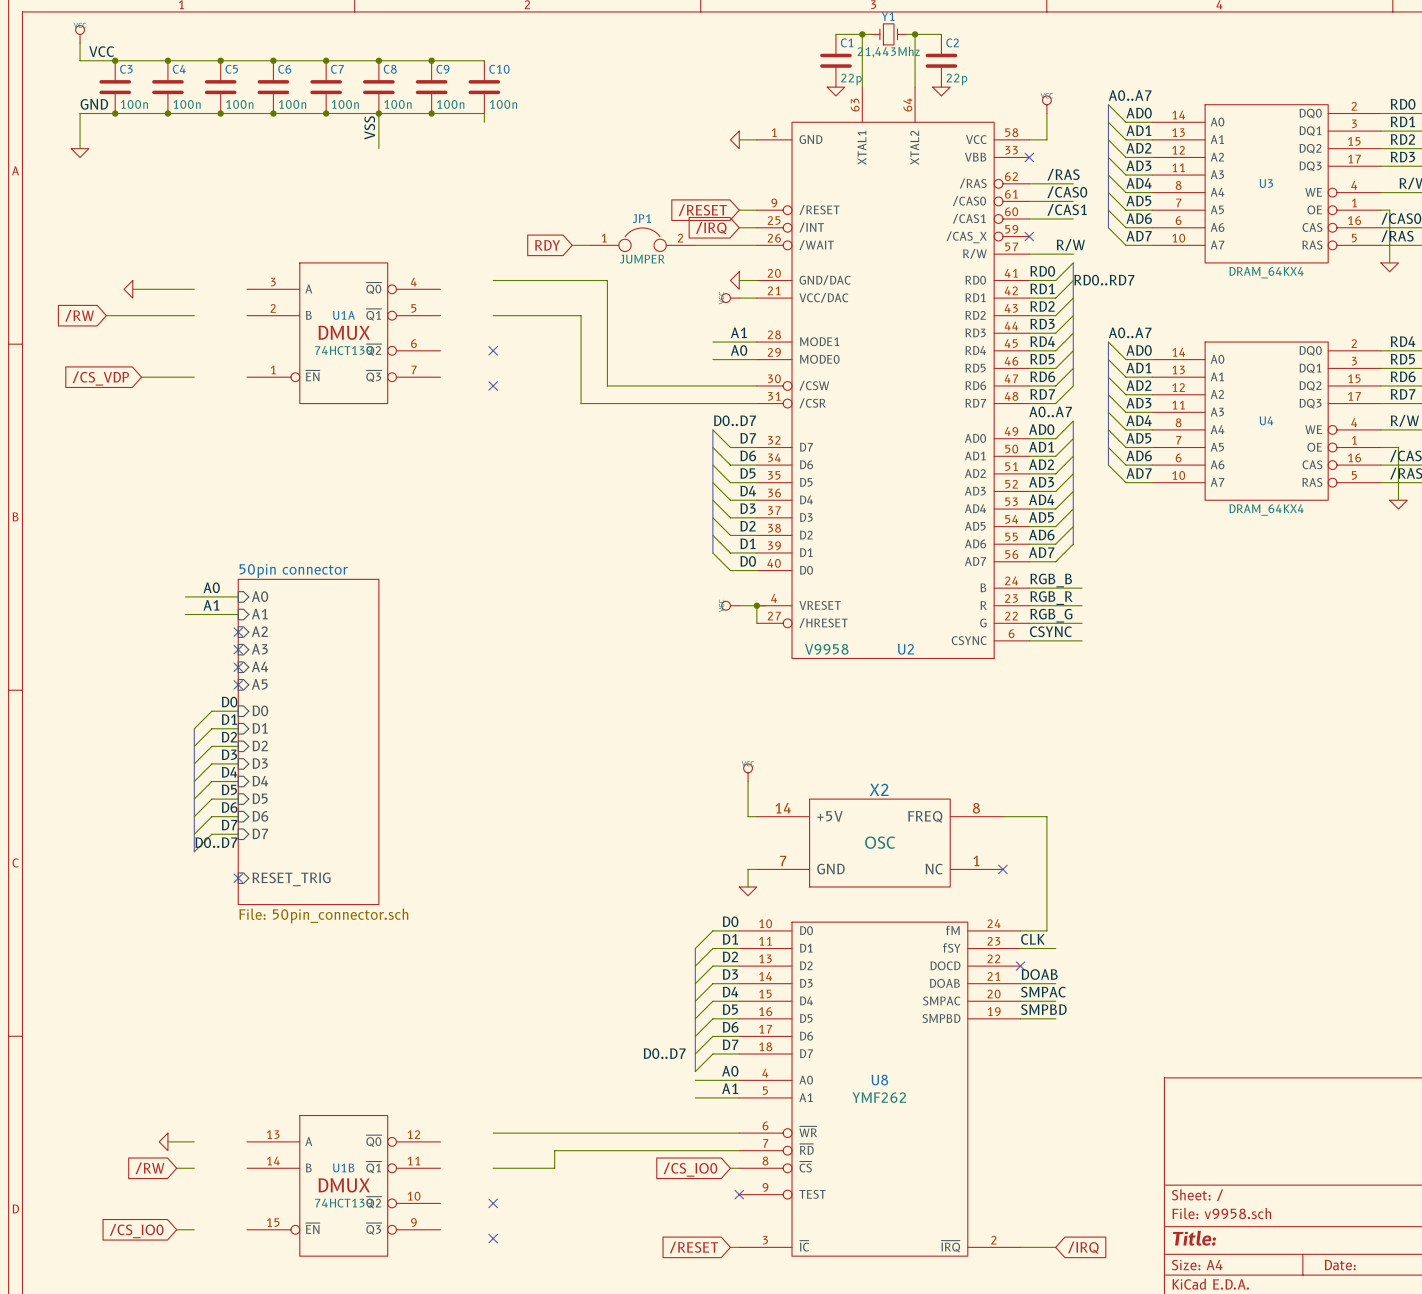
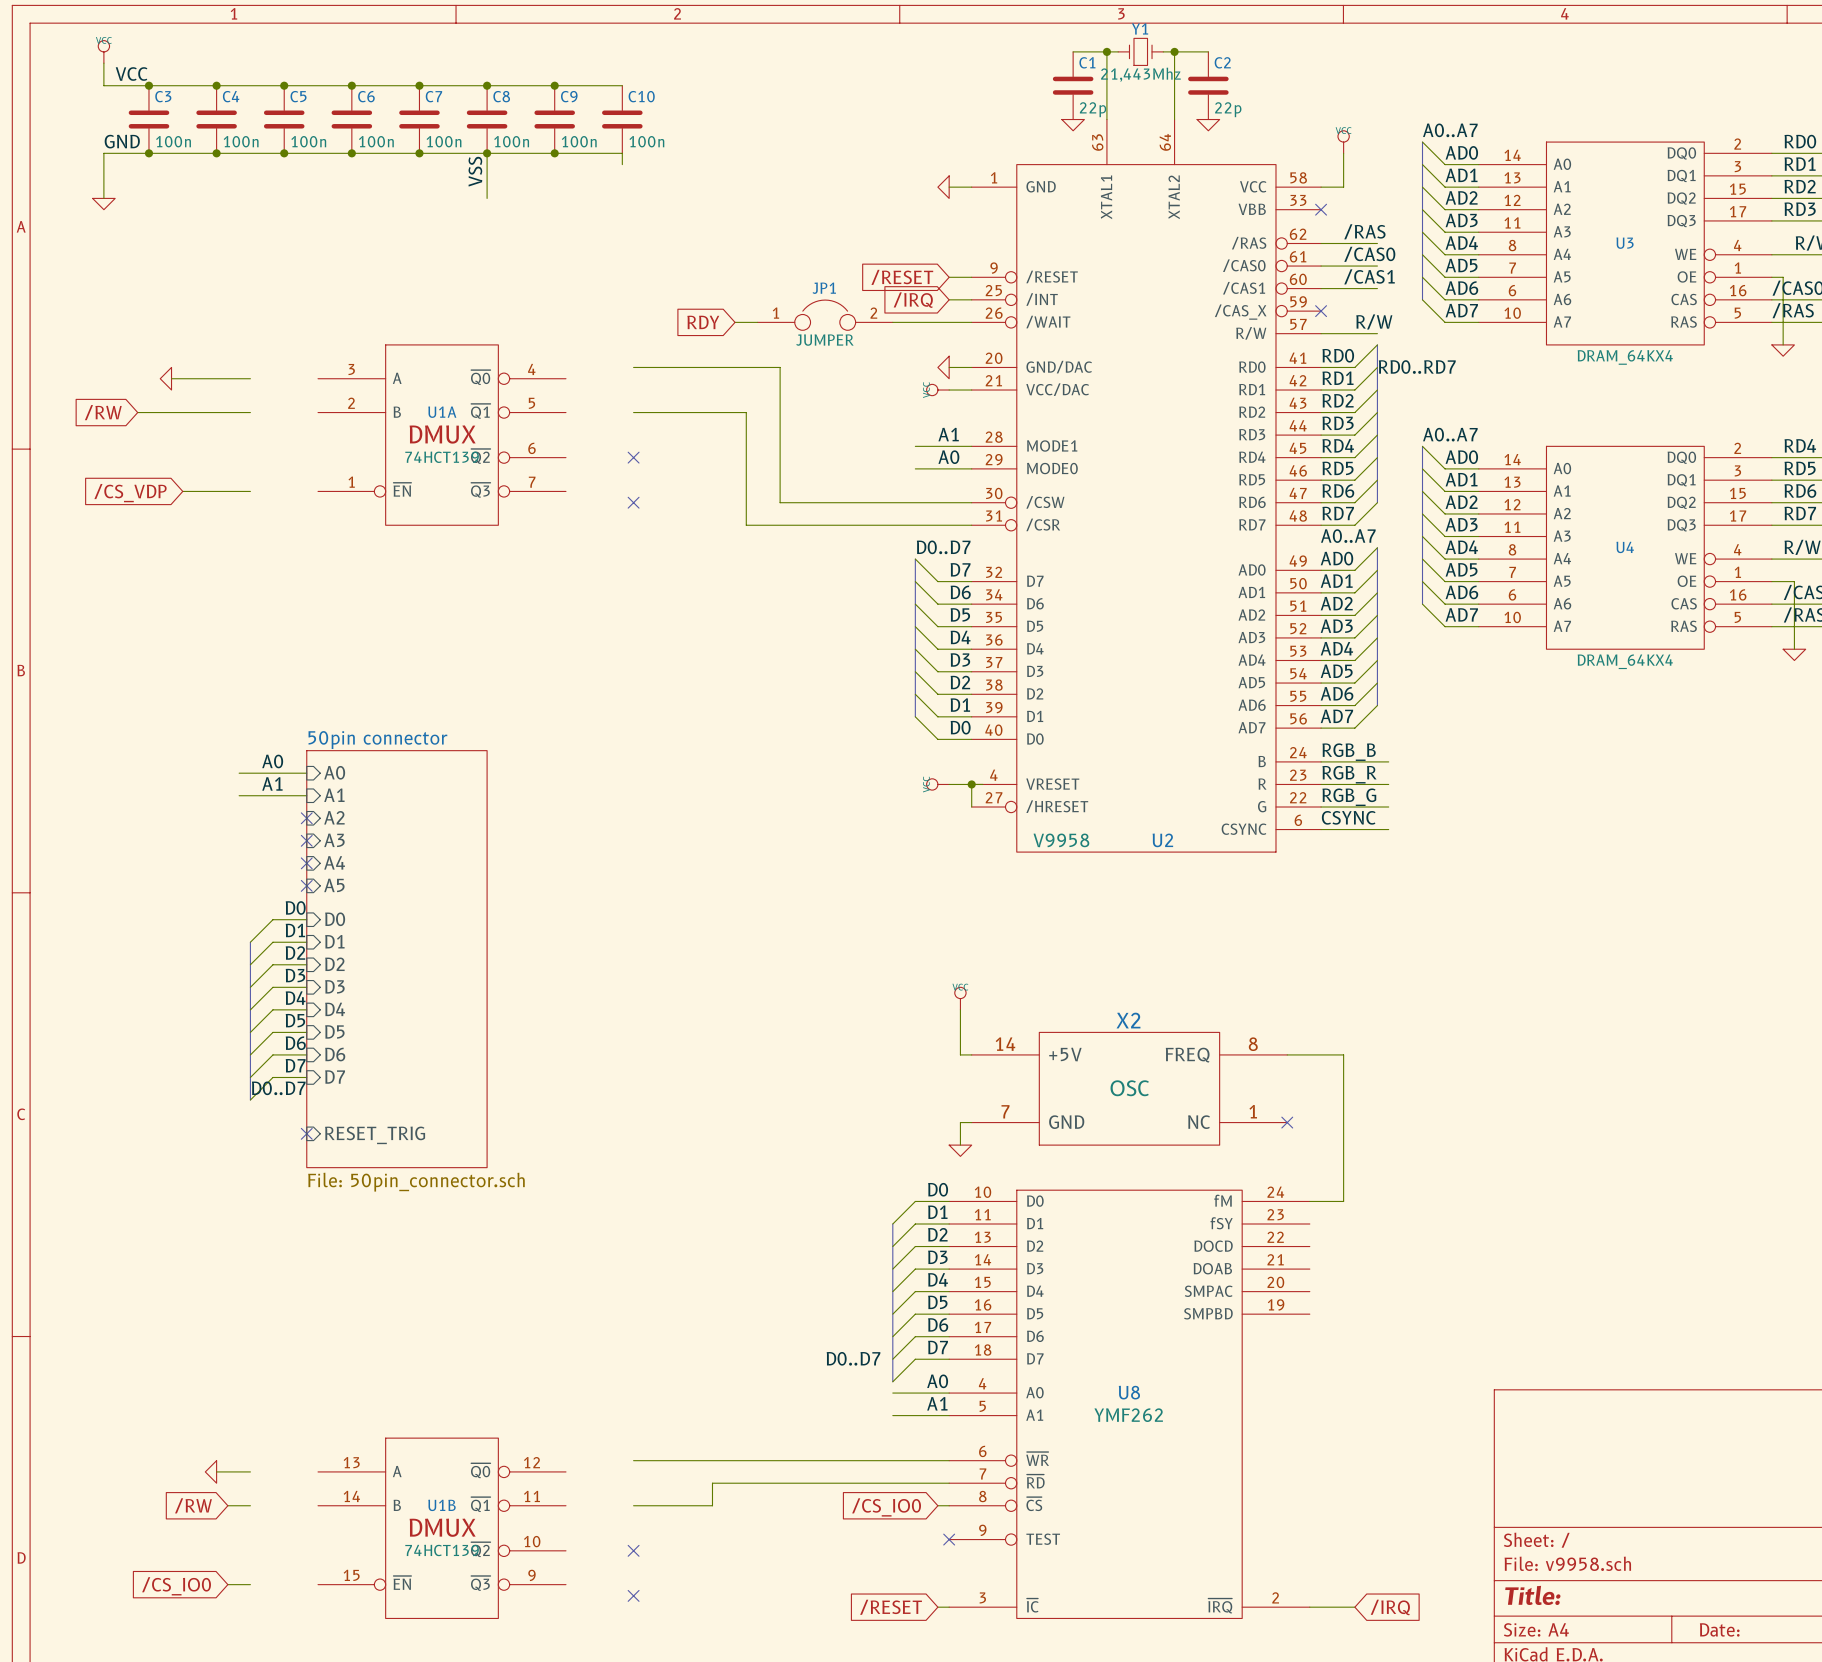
label: CLK (1032, 939) -> none
wire: (1020, 948) (1055, 948) -> none
no-connect mark: (1020, 966) -> none
label: DOAB (1039, 974) -> none
wire: (1020, 983) (1055, 983) -> none
label: SMPAC (1043, 992) -> none
wire: (1020, 1001) (1055, 1001) -> none
label: SMPBD (1043, 1009) -> none
wire: (1020, 1018) (1055, 1018) -> none

